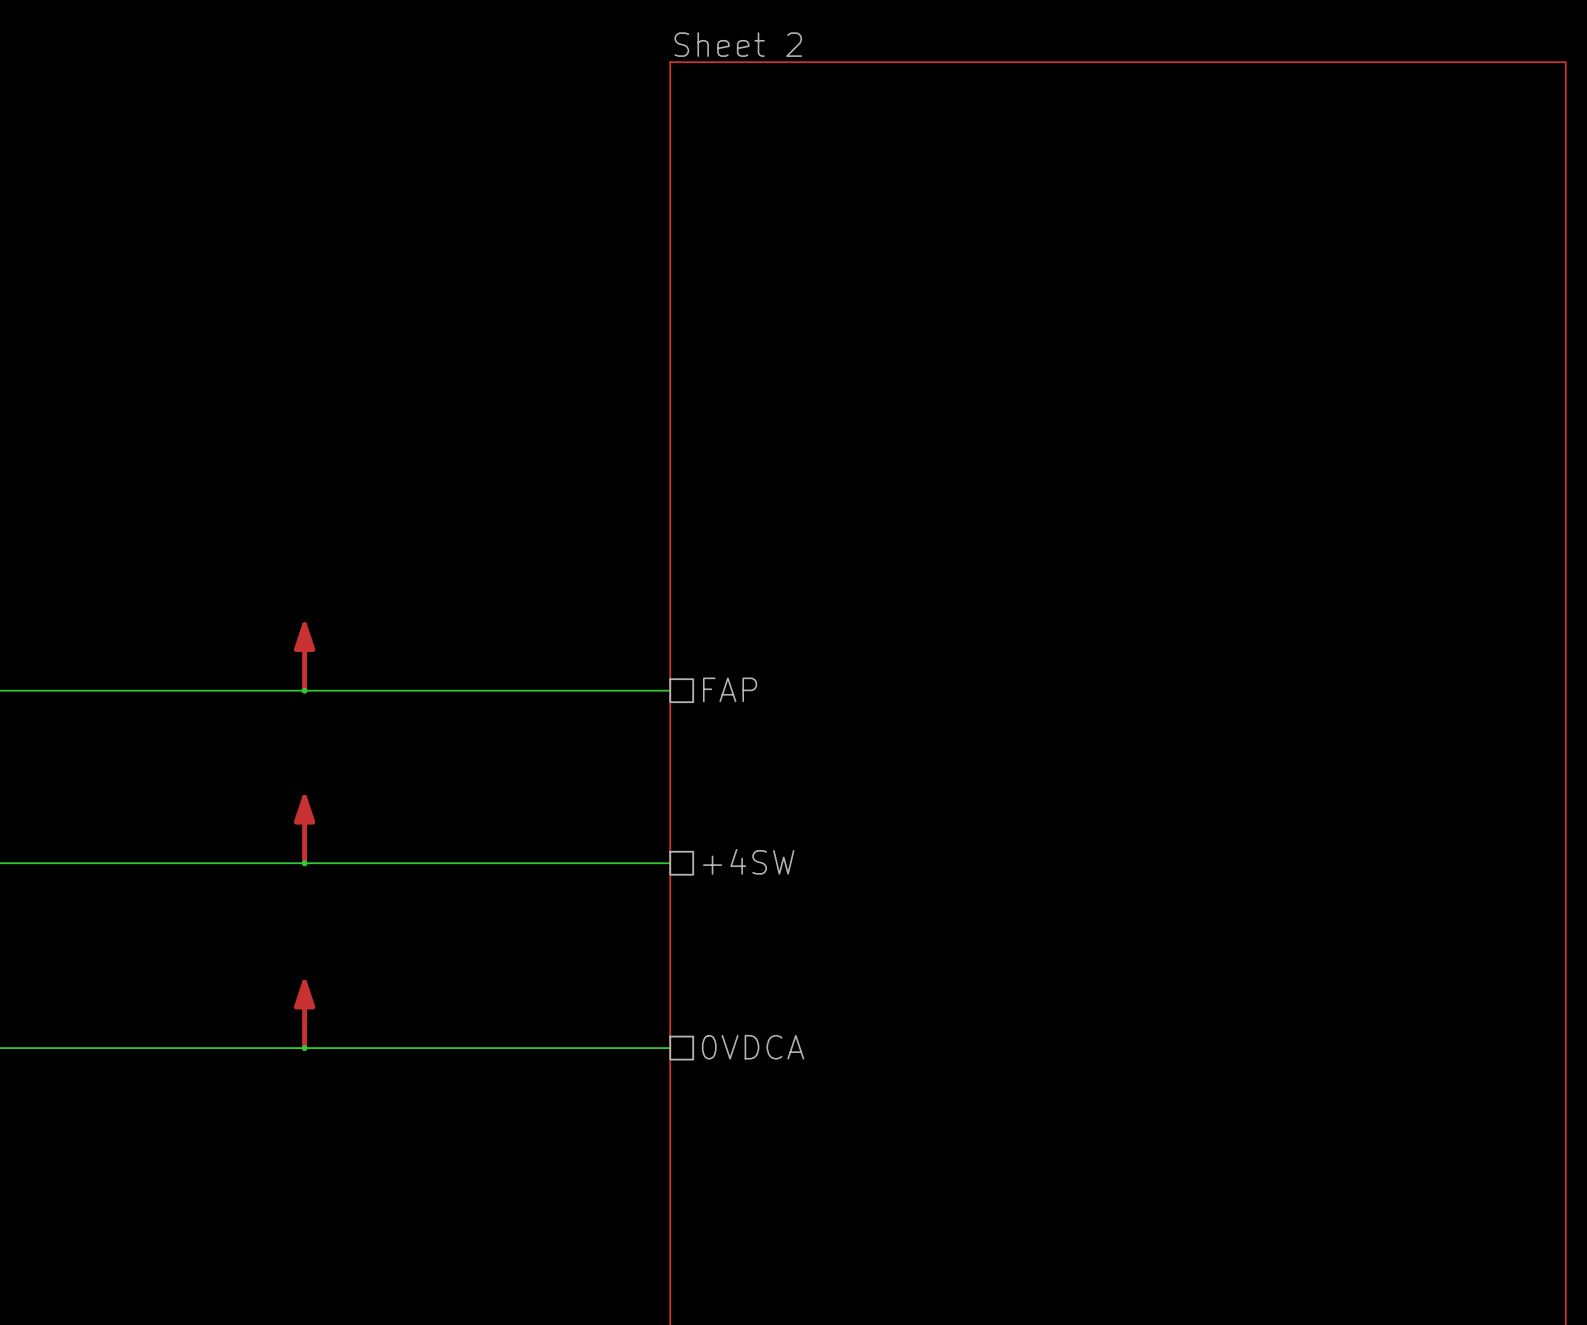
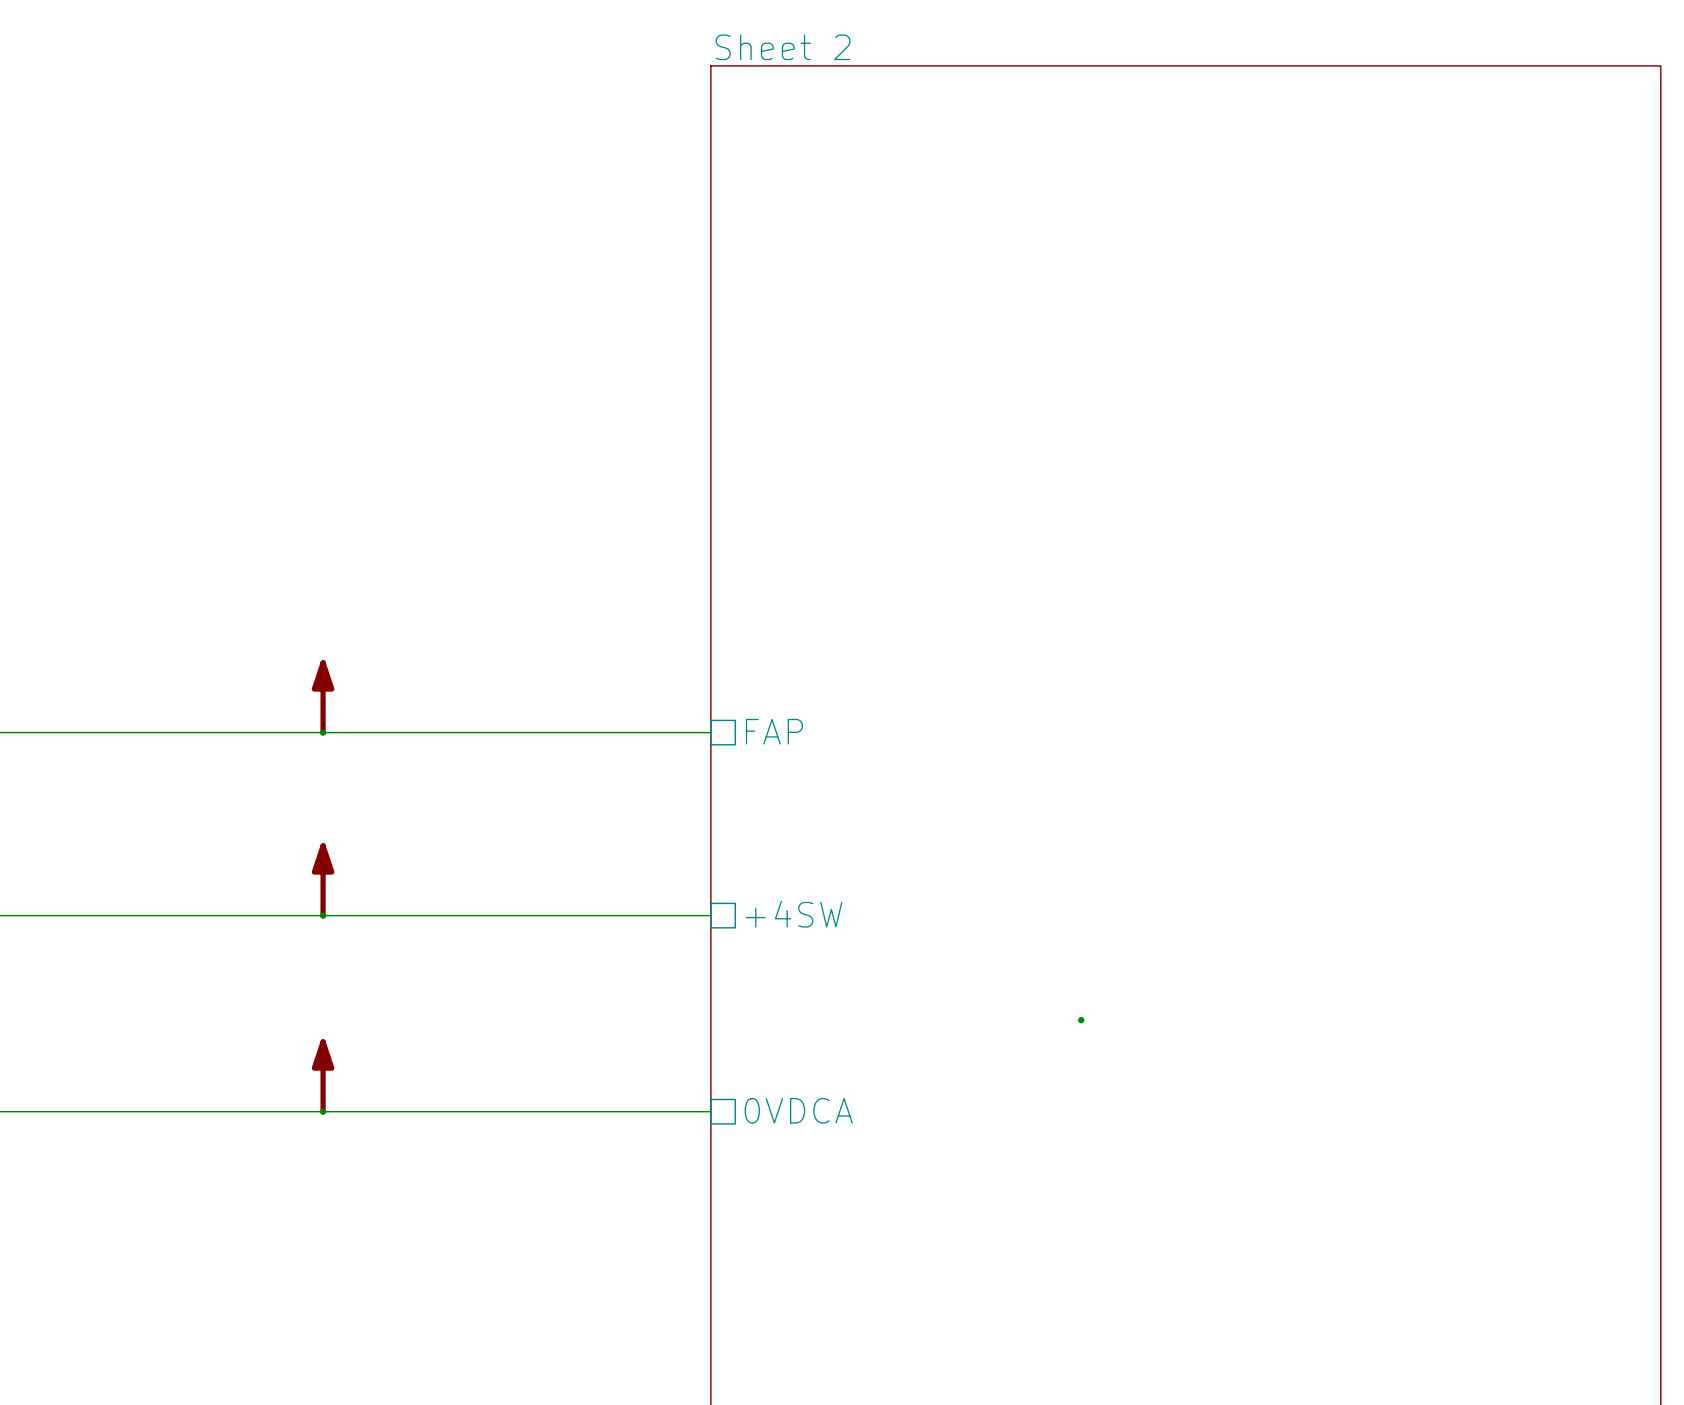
junction: none -> (1081, 1020)

